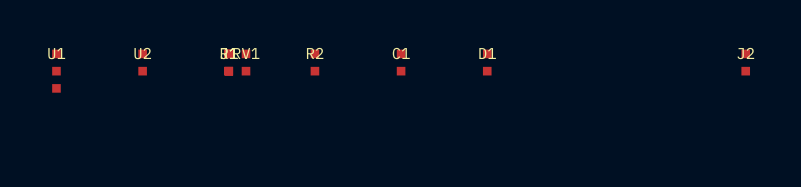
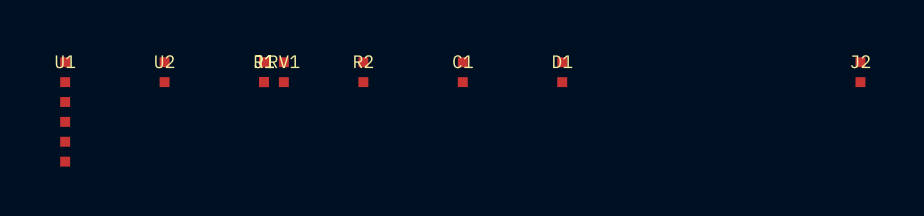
U1 footprint: [52, 49, 61, 93] -> [60, 57, 71, 167]

